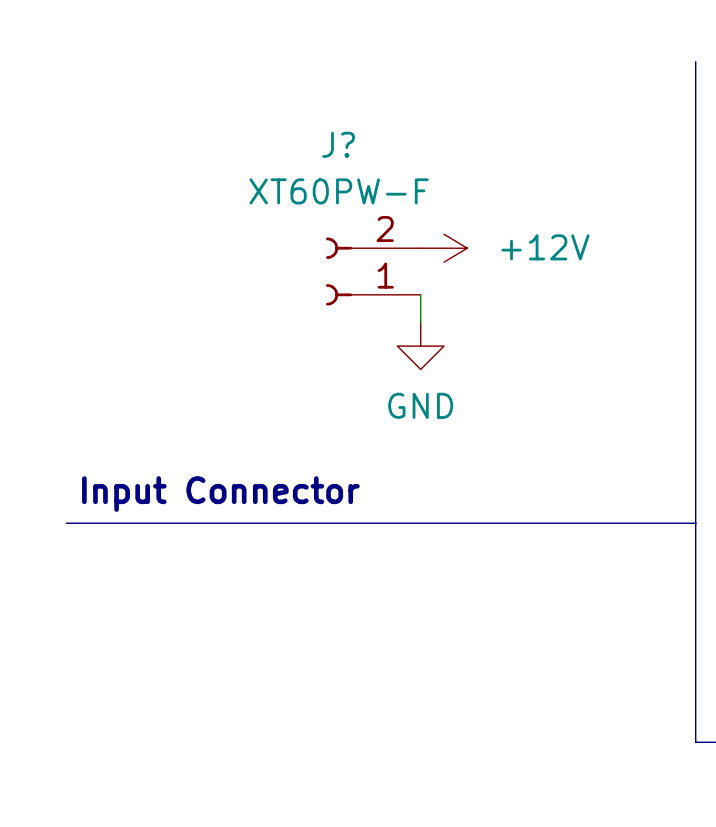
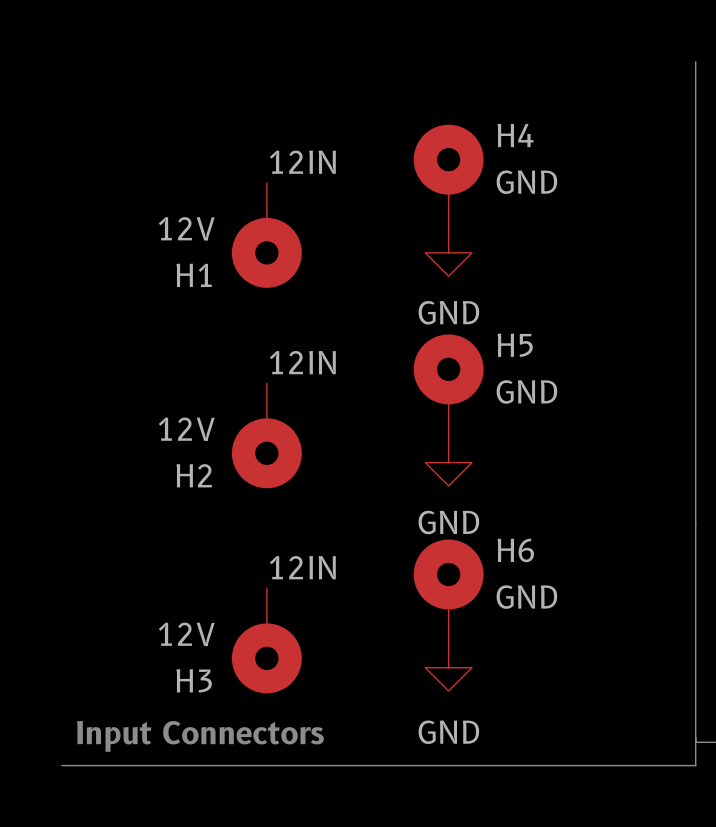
label: none -> 12IN (302, 162)
H4: none -> GND (448, 177)
H1: none -> 12V (266, 235)
power symbol: +12V (443, 248) -> GND (448, 252)
J?: XT60PW-F (373, 271) -> none
wire: (420, 294) (420, 322) -> none
power symbol position: GND (420, 346) -> GND (448, 462)
label: none -> 12IN (302, 362)
H5: none -> GND (448, 386)
H2: none -> 12V (266, 435)
text: Input Connector (220, 494) -> none
line: (66, 523) (695, 523) -> none
label: none -> 12IN (302, 567)
H6: none -> GND (448, 591)
H3: none -> 12V (266, 640)
power symbol: none -> GND (448, 667)
text: none -> Input Connectors (200, 736)
line: none -> (695, 742) (695, 765) (61, 765)

